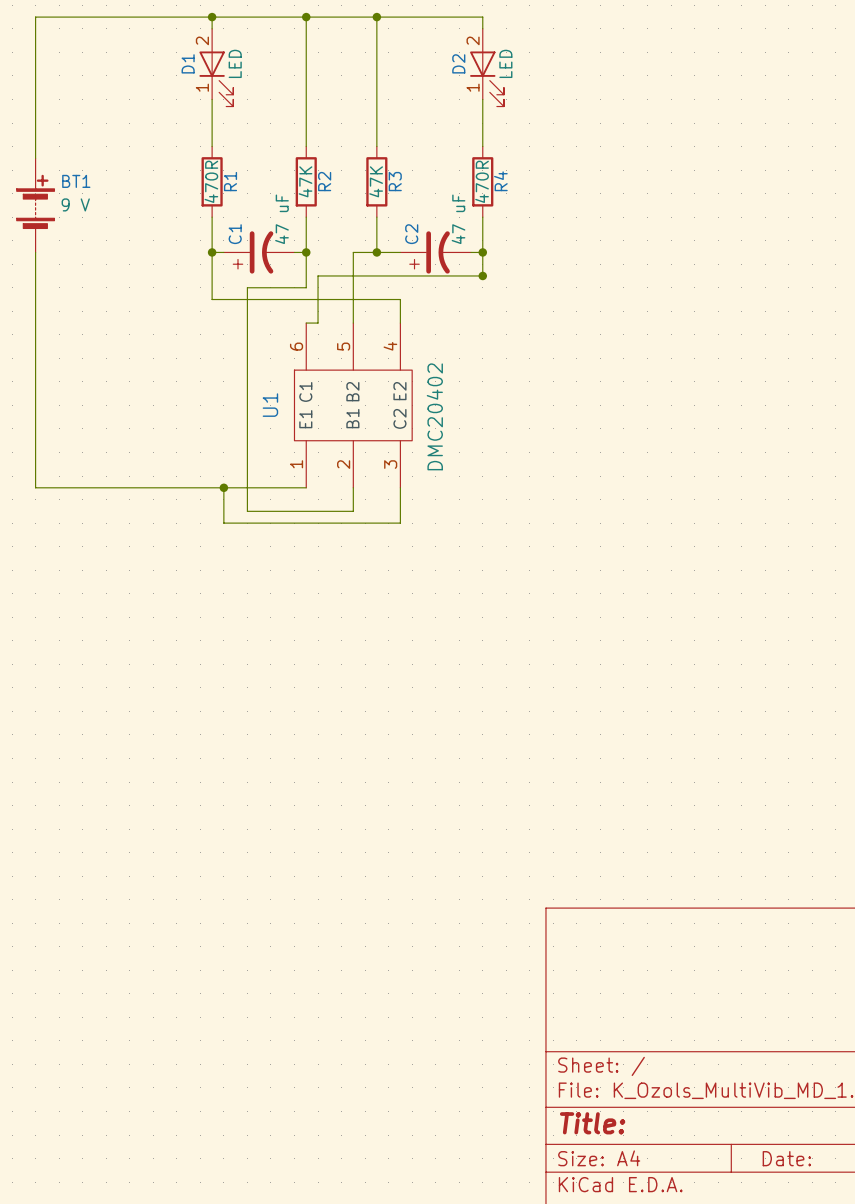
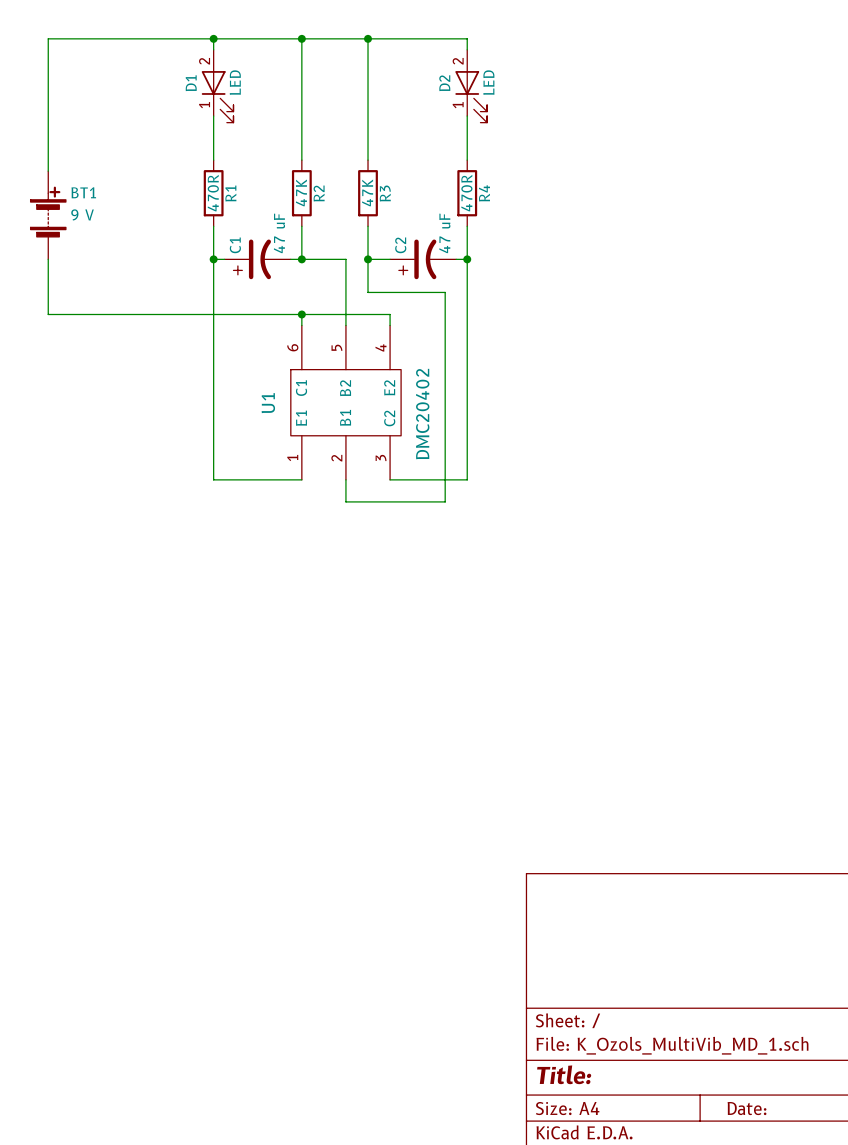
wire: (306, 252) (306, 287) (247, 287) (247, 511) (353, 511) -> (368, 259) (368, 292) (445, 292) (445, 501) (345, 501)
wire: (353, 252) (376, 252) -> (345, 259) (301, 259)
wire: (482, 275) (318, 275) (318, 323) (306, 323) -> (301, 314) (301, 325)
junction: (482, 275) -> none
wire: (212, 299) (400, 299) (400, 311) -> (48, 314) (390, 314)
wire: (35, 311) (35, 487) (212, 487) -> (213, 303) (213, 479)
junction: none -> (301, 314)
wire: (223, 487) (223, 523) (400, 523) (400, 487) -> (467, 281) (467, 479) (390, 479)
junction: (223, 487) -> none

